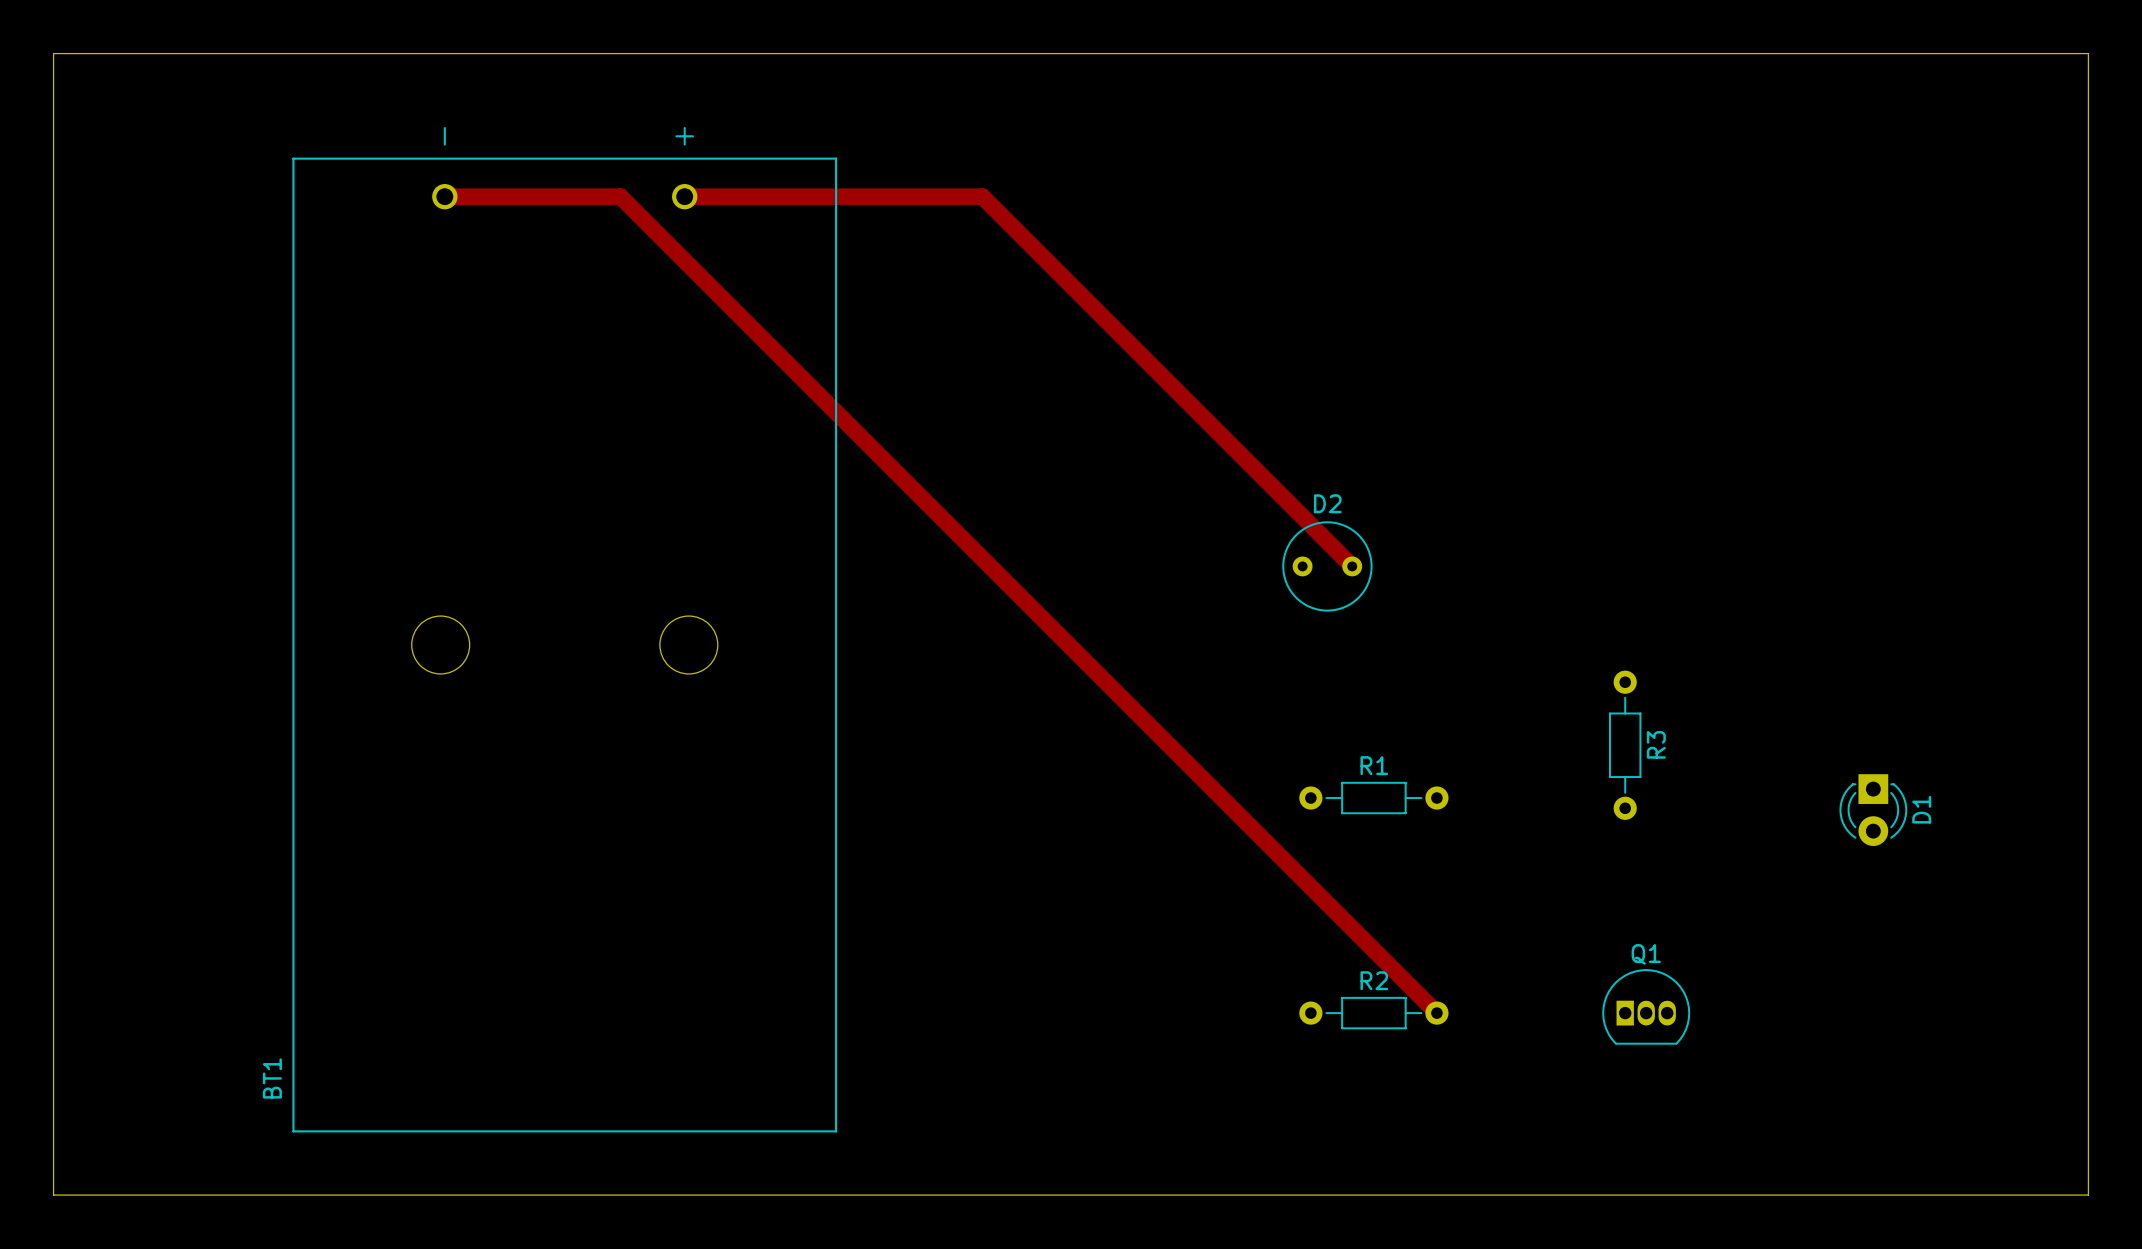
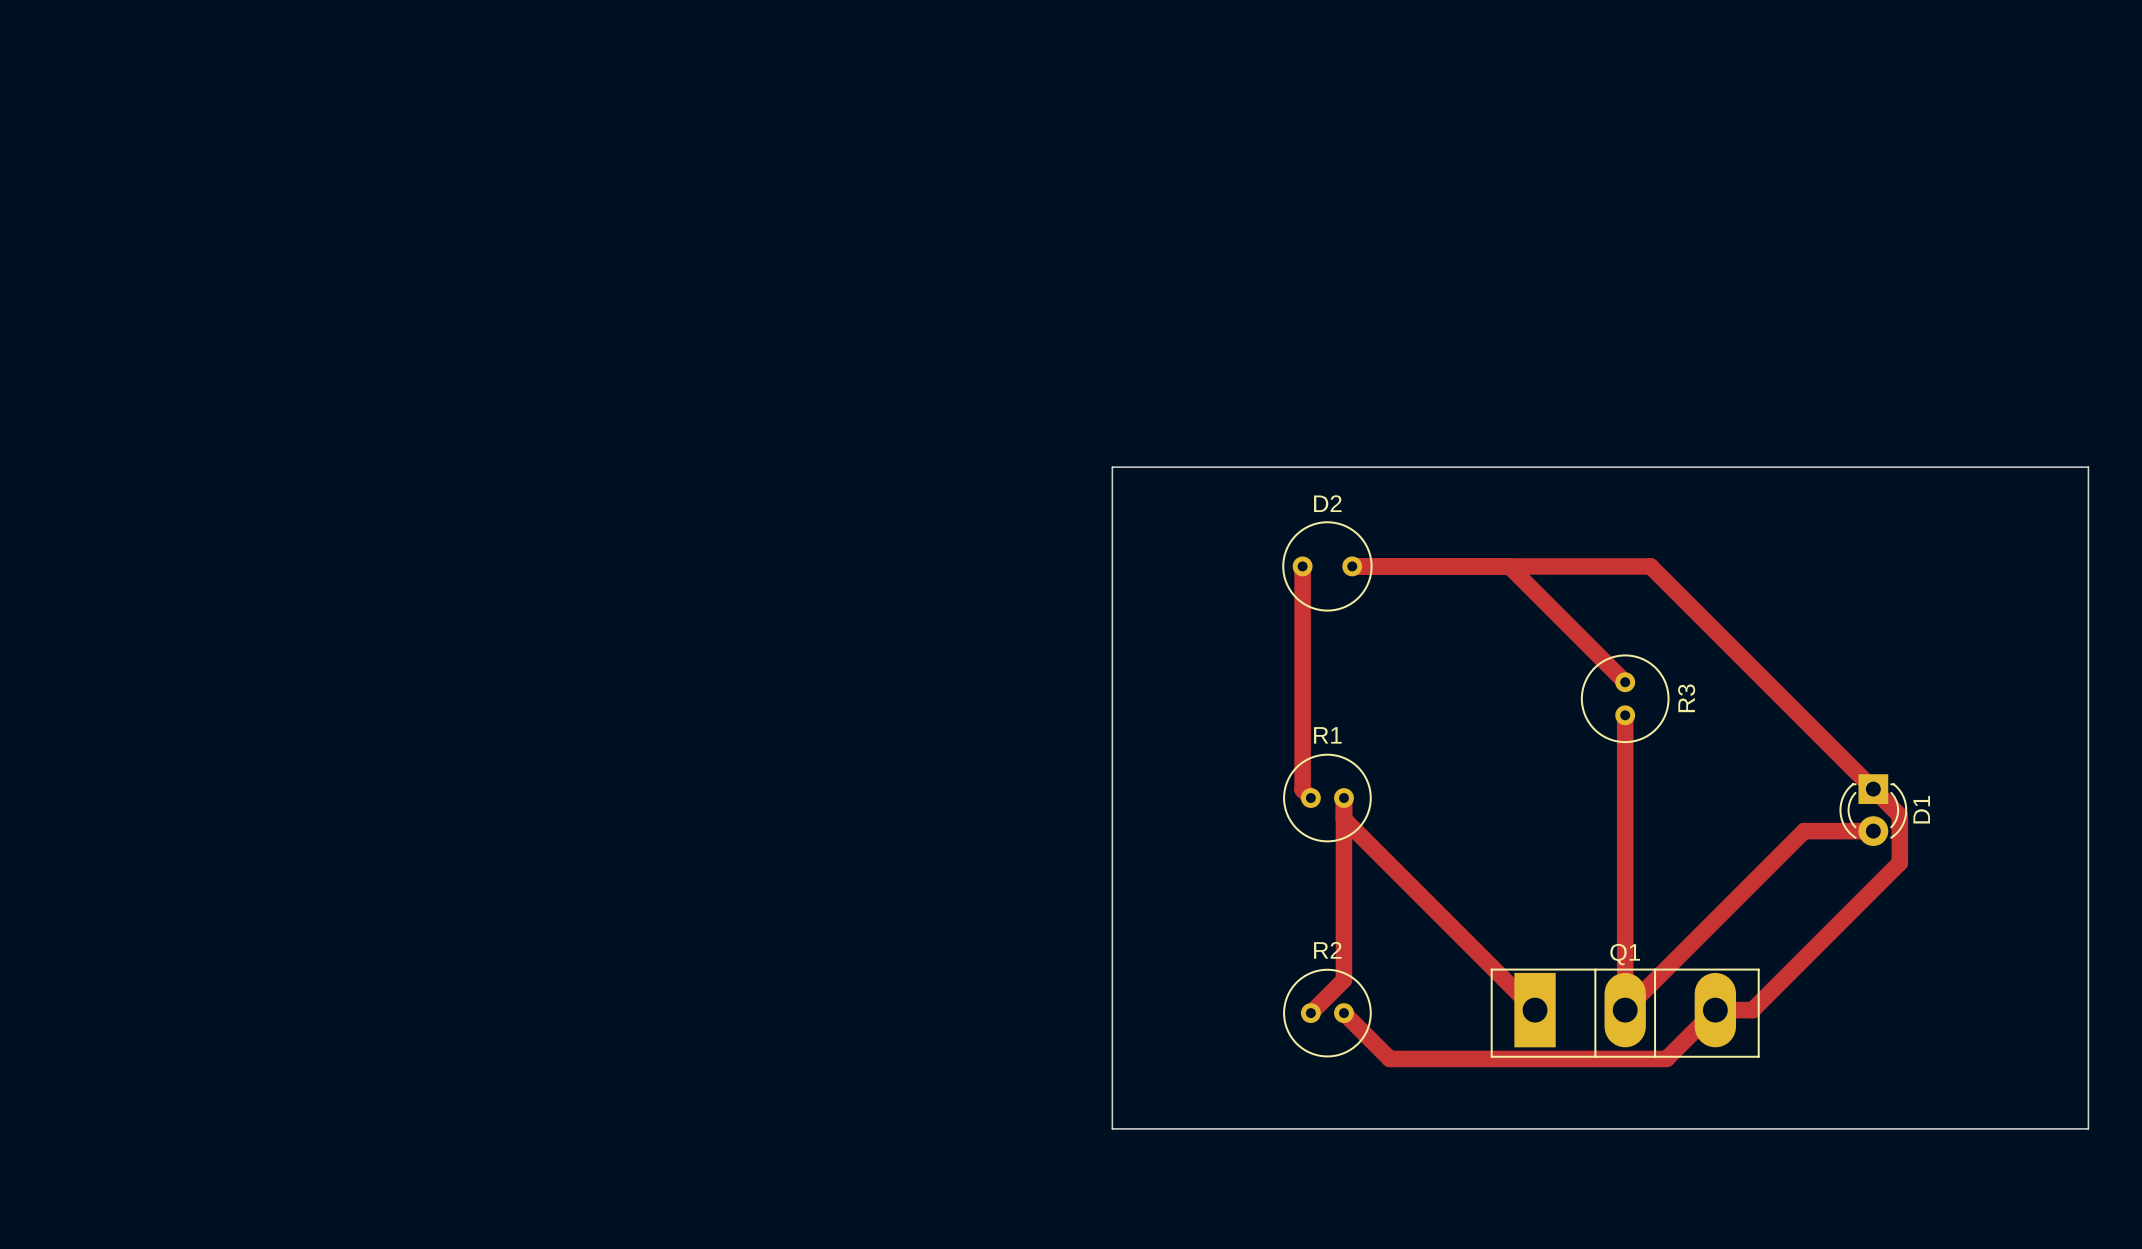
top track: (444, 196) (620, 196) (1436, 1013) -> none
top track: (684, 196) (982, 196) (1352, 566) -> (1343, 1013) (1389, 1058) (1666, 1058) (1715, 1010) (1752, 1010) (1899, 862) (1899, 815) (1650, 566) (1352, 566)
board edge: (2088, 467) (2088, 53) (53, 53) (53, 1195) (2088, 1195) (2088, 1128) -> (2088, 467) (1112, 467) (1112, 1128) (2088, 1128)
top track: none -> (1302, 566) (1302, 789) (1310, 798)
top track: none -> (1509, 566) (1625, 682)
BT1: (564, 629) -> none
R3 footprint: [1608, 670, 1642, 820] -> [1580, 654, 1670, 744]
top track: none -> (1625, 715) (1625, 1010) (1804, 831) (1873, 831)
R1 footprint: [1299, 781, 1449, 815] -> [1283, 753, 1372, 843]
top track: none -> (1343, 798) (1343, 980) (1310, 1013)
top track: none -> (1343, 819) (1535, 1010)
Q1 footprint: [1602, 969, 1691, 1045] -> [1490, 968, 1760, 1058]
R2 footprint: [1299, 996, 1449, 1030] -> [1283, 968, 1372, 1058]

